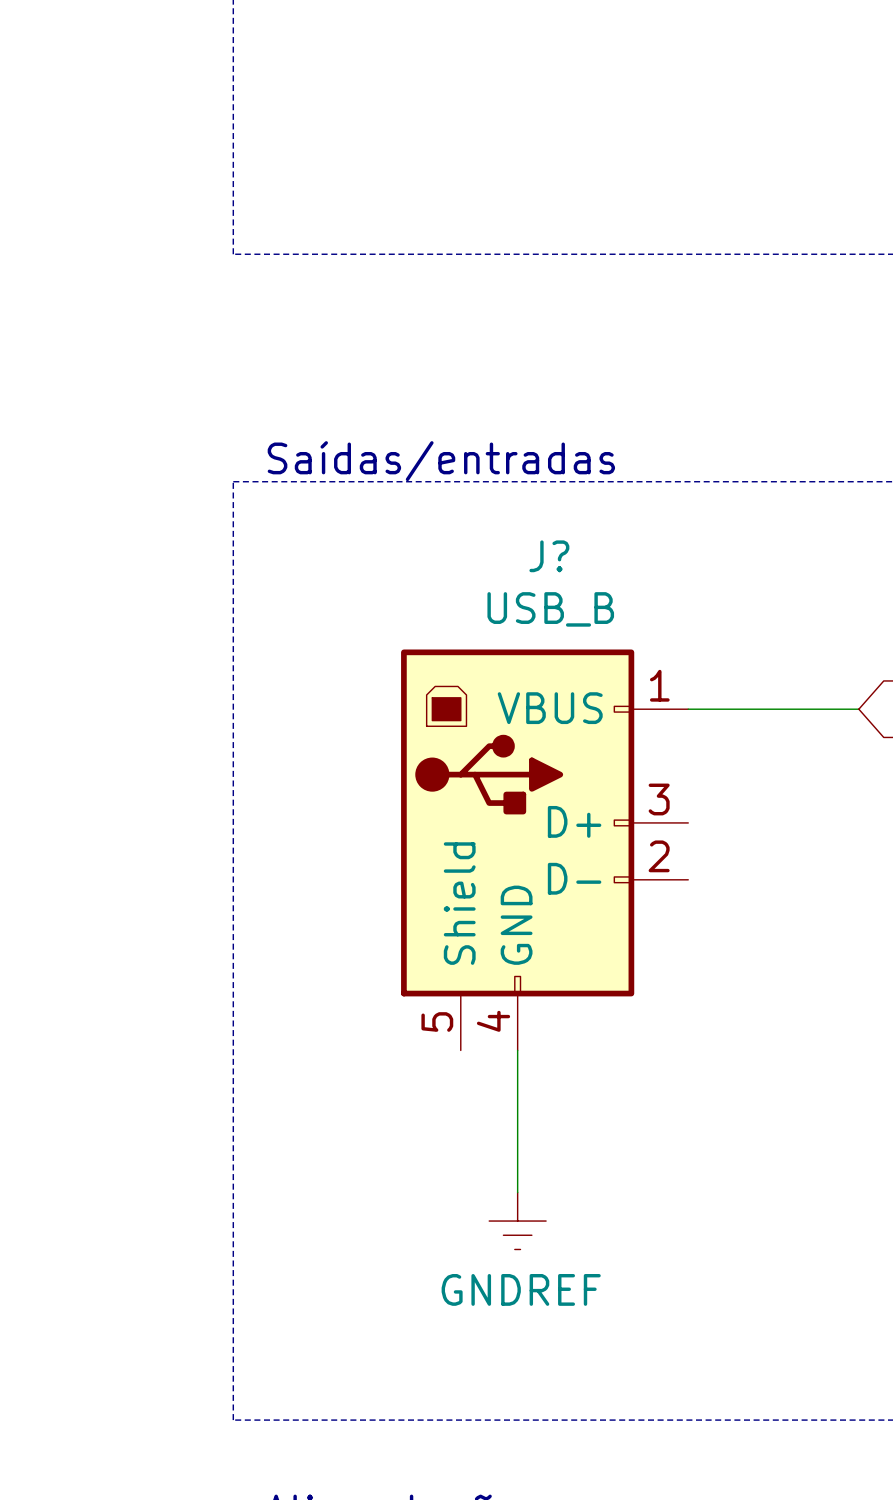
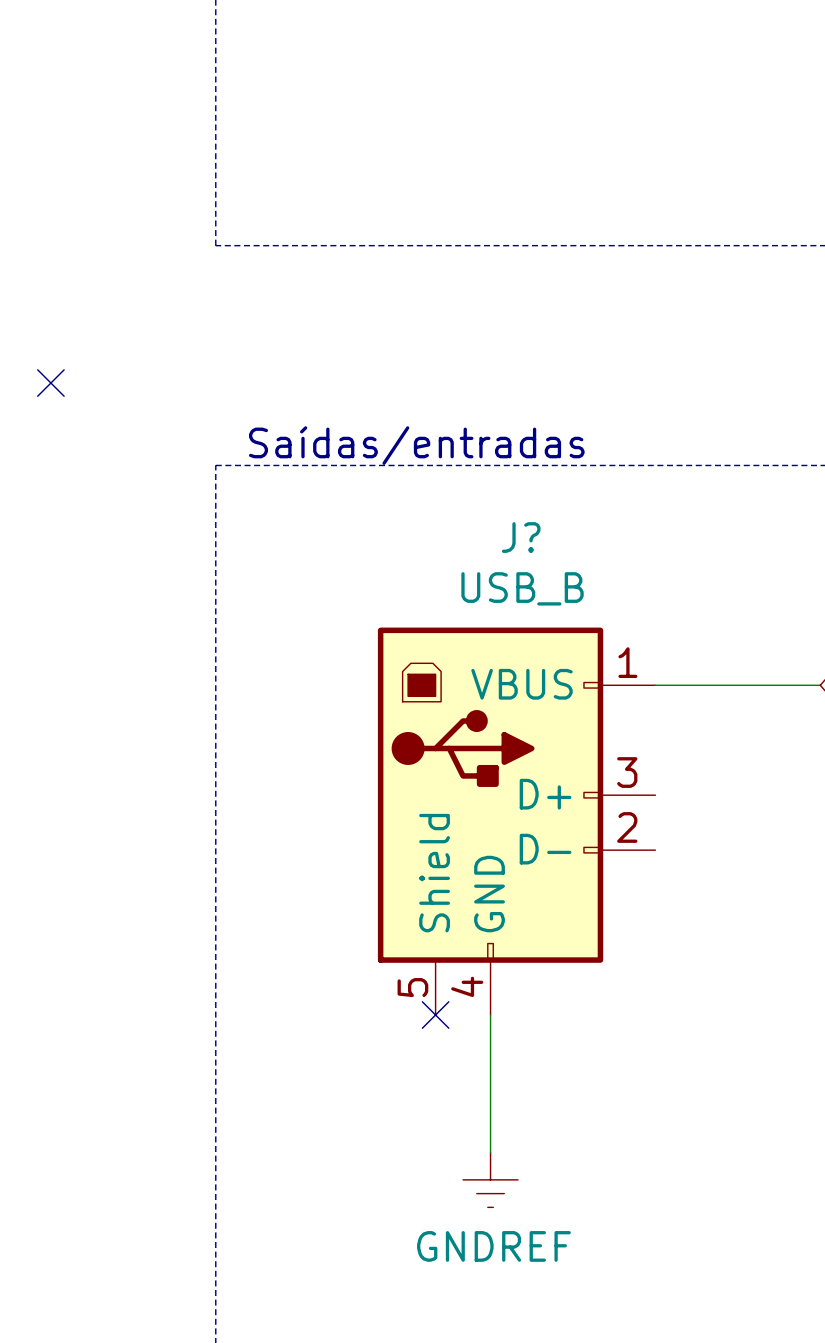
no-connect mark: none -> (50, 383)
no-connect mark: none -> (435, 1015)

